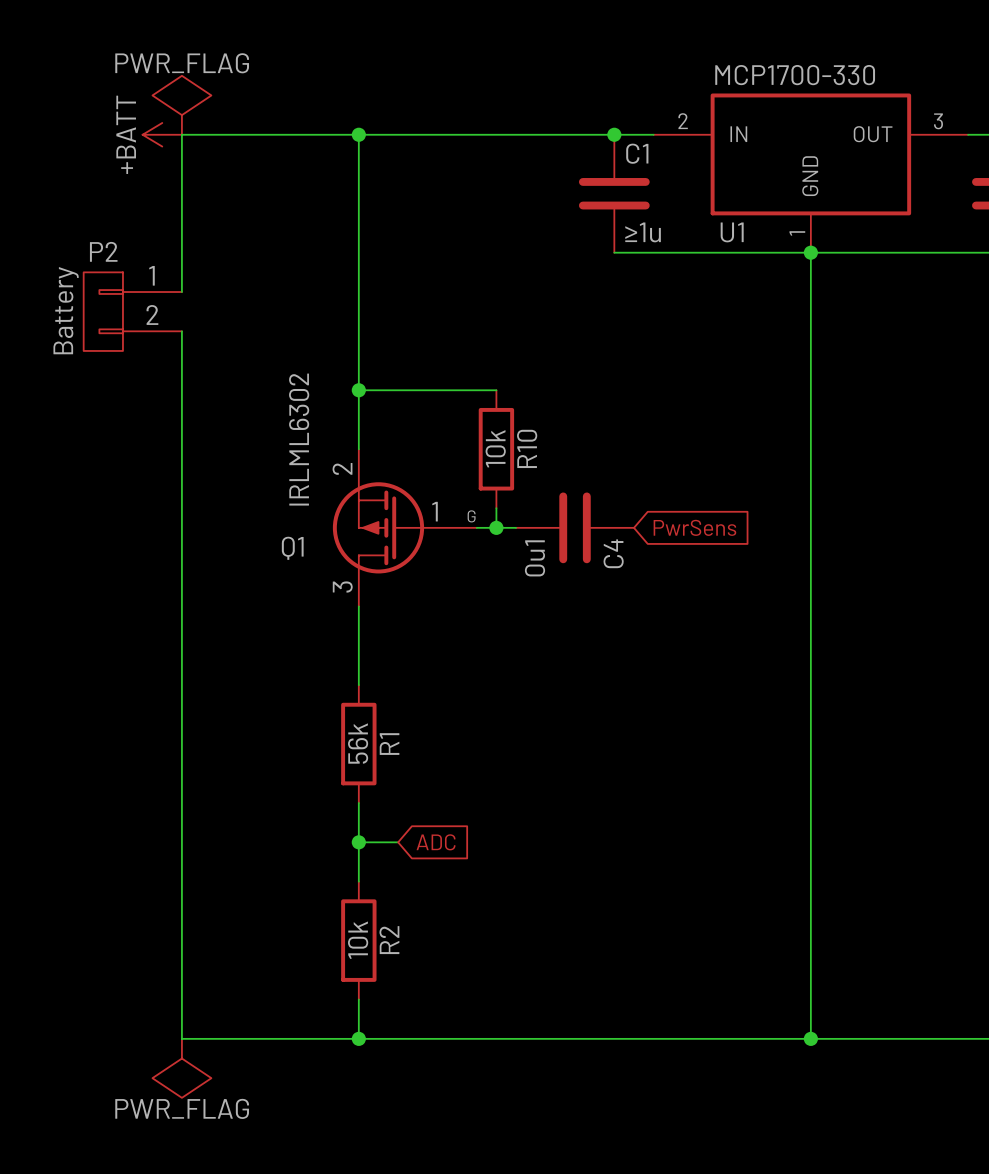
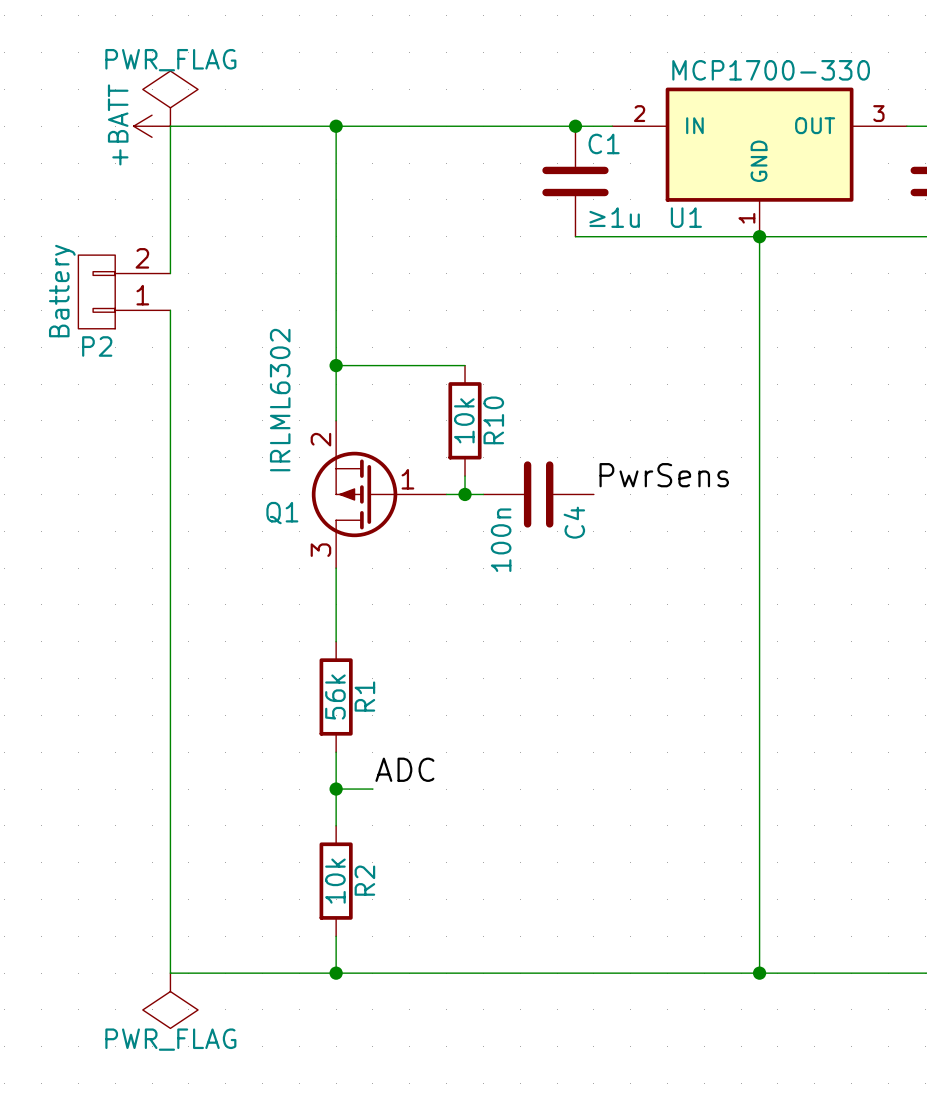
P2 flip: as is (103, 311) -> up-down (96, 291)
label: none -> PwrSens (664, 475)
label: G (471, 516) -> none
global label: PwrSens (694, 527) -> none
C4 value: 0u1 (535, 558) -> 100n (501, 540)
label: none -> ADC (404, 769)
global label: ADC (436, 842) -> none

